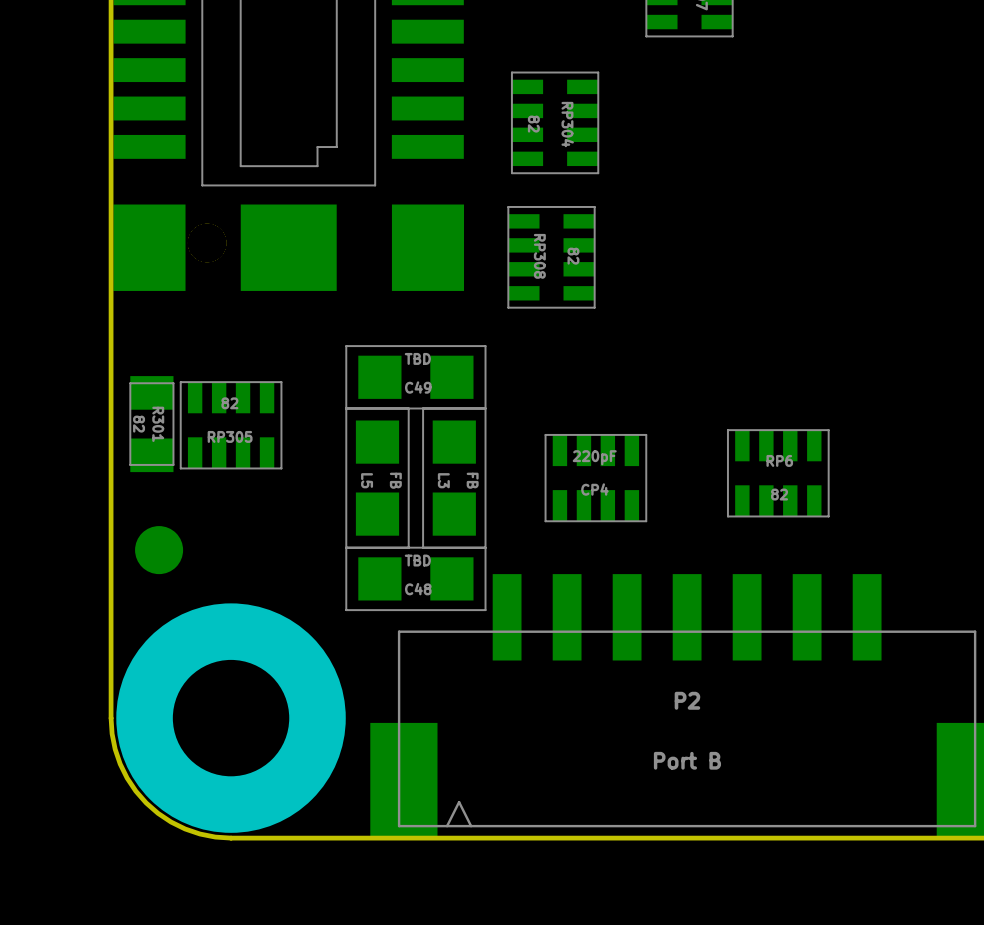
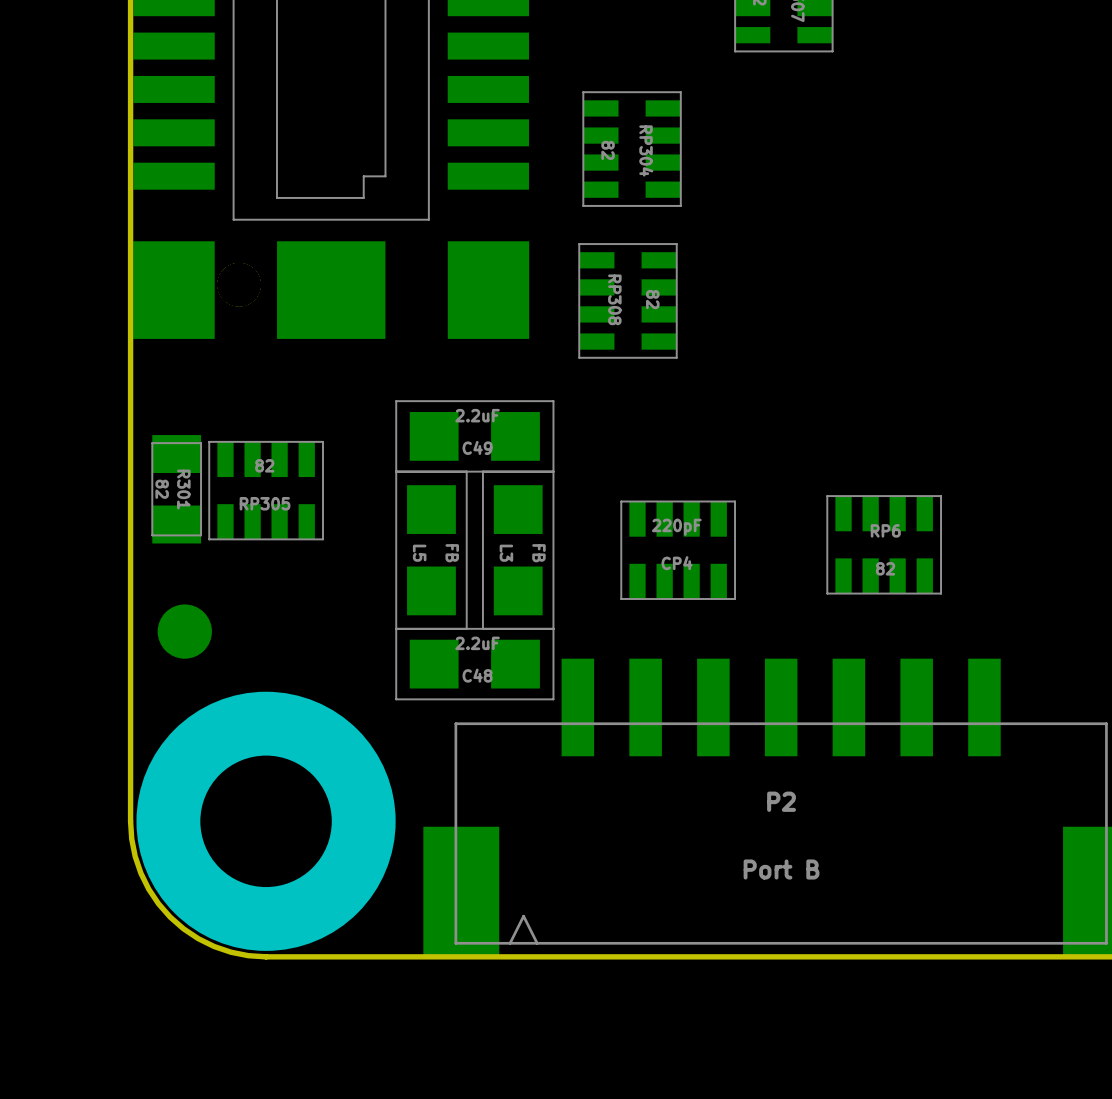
C49 value: TBD (417, 358) -> 2.2uF (477, 415)
C48 value: TBD (417, 560) -> 2.2uF (477, 643)

